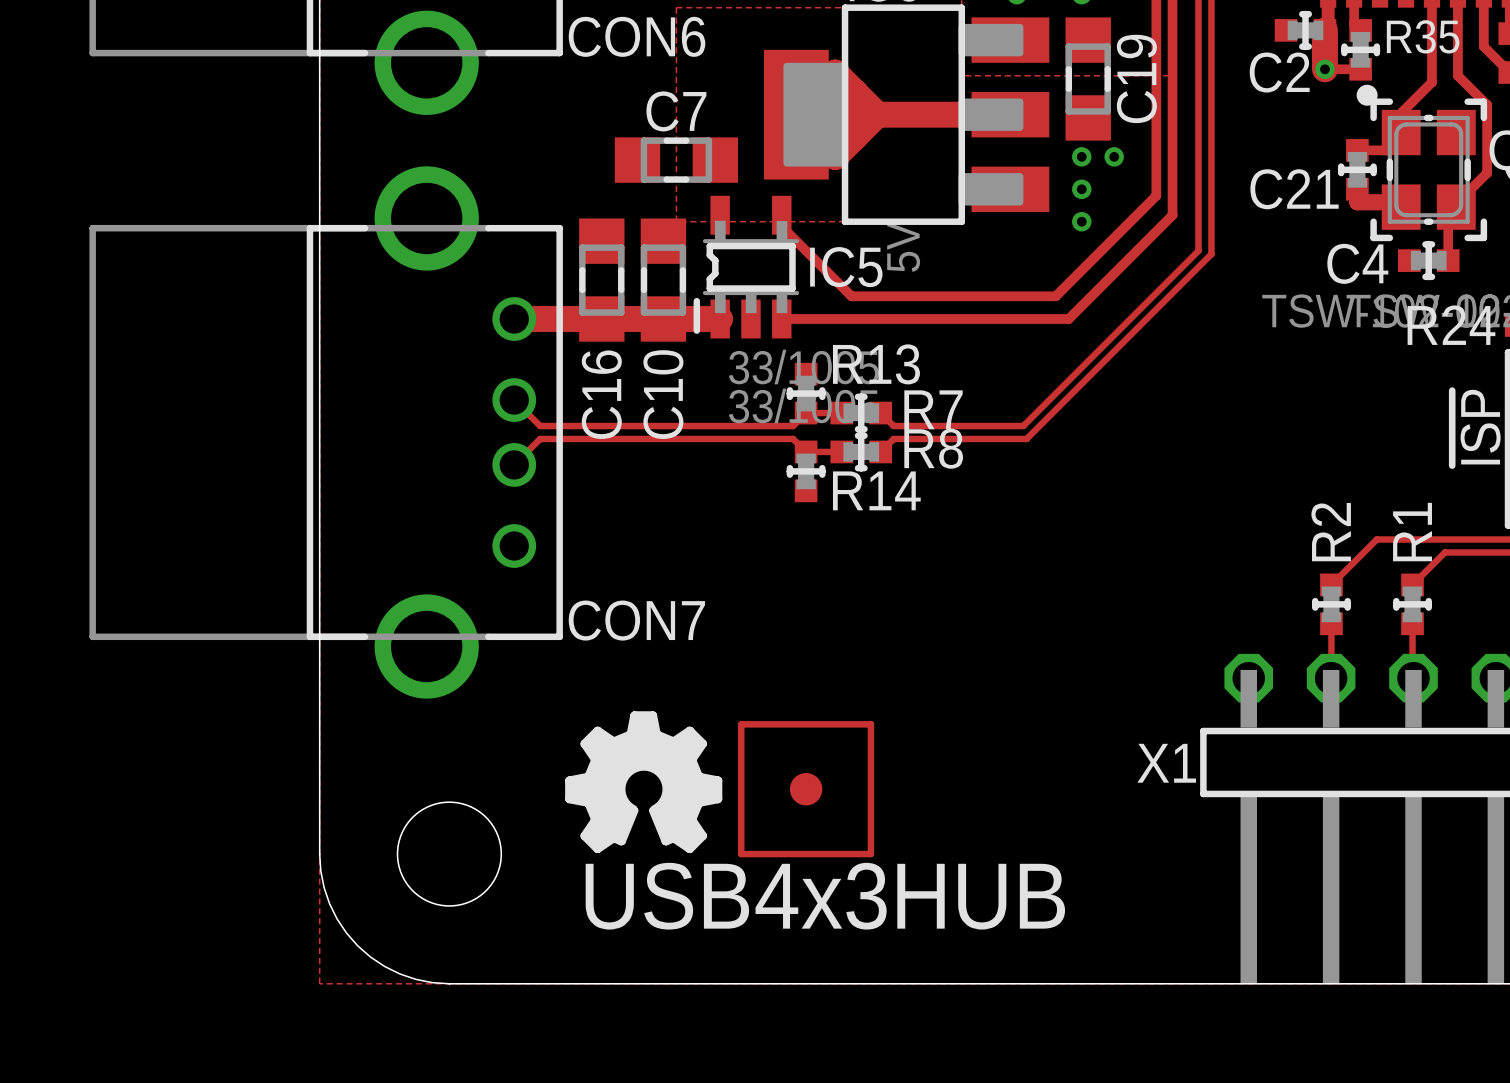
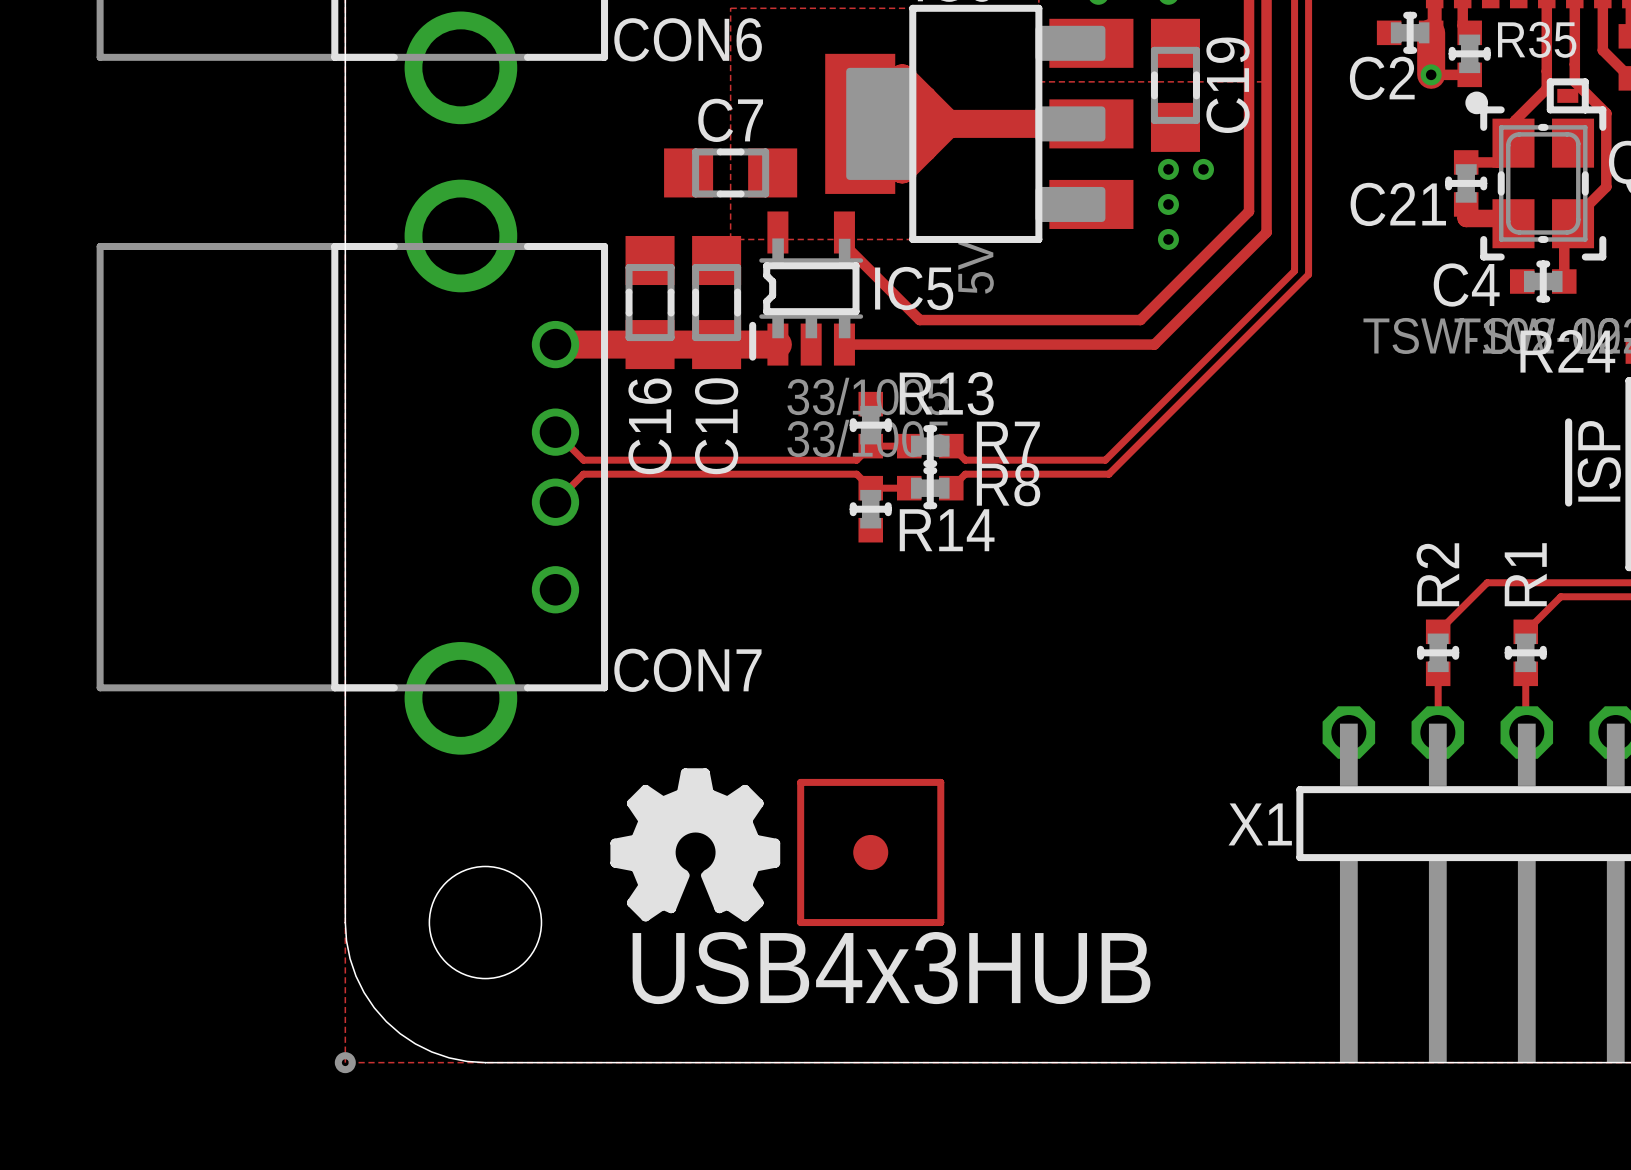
part: none -> (1567, 95)
drawing: none -> [334, 1052, 356, 1074]

